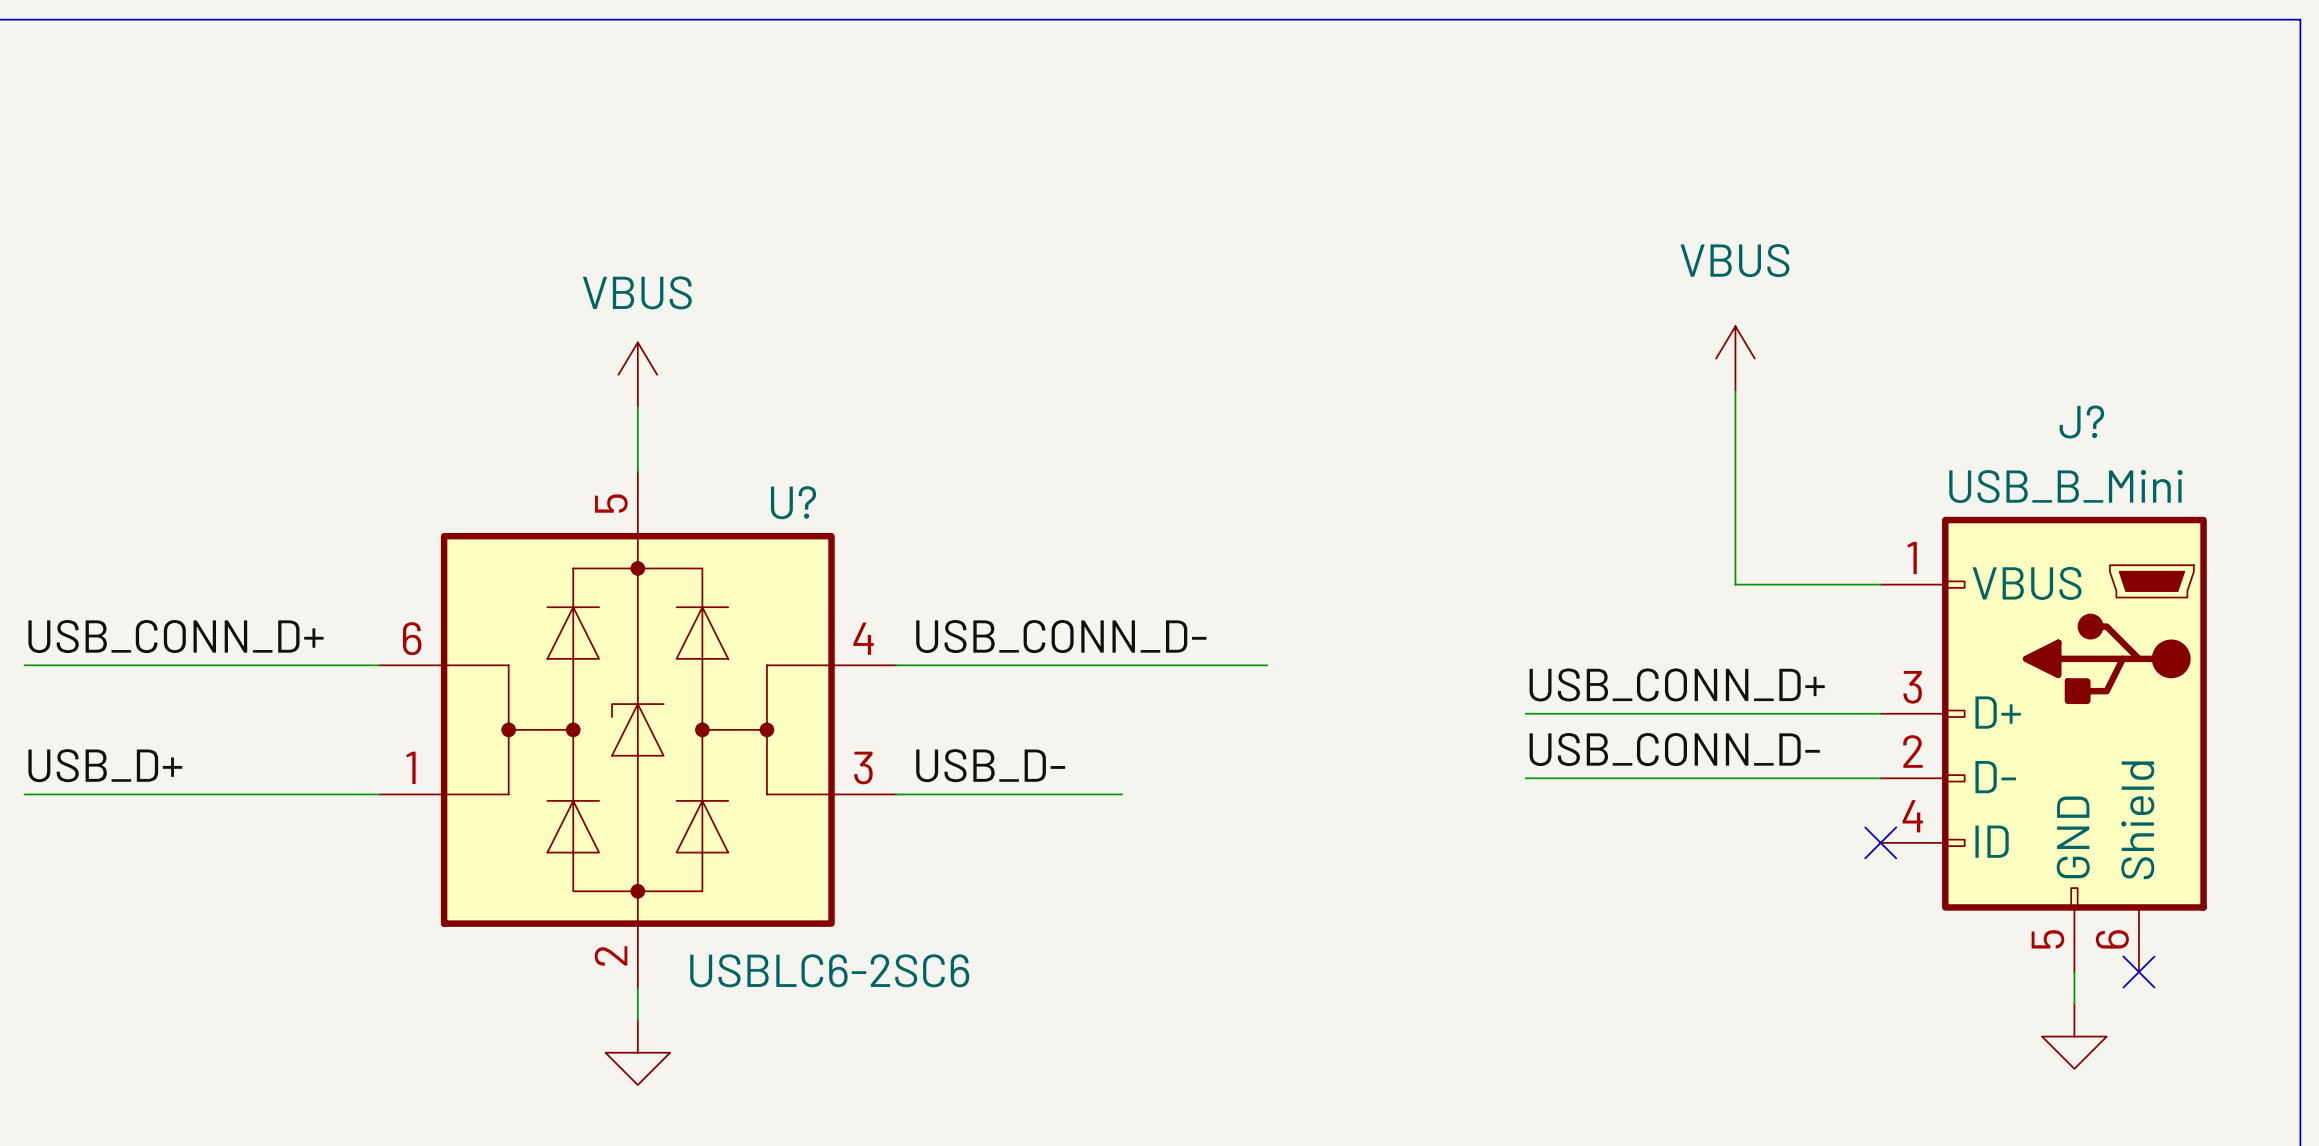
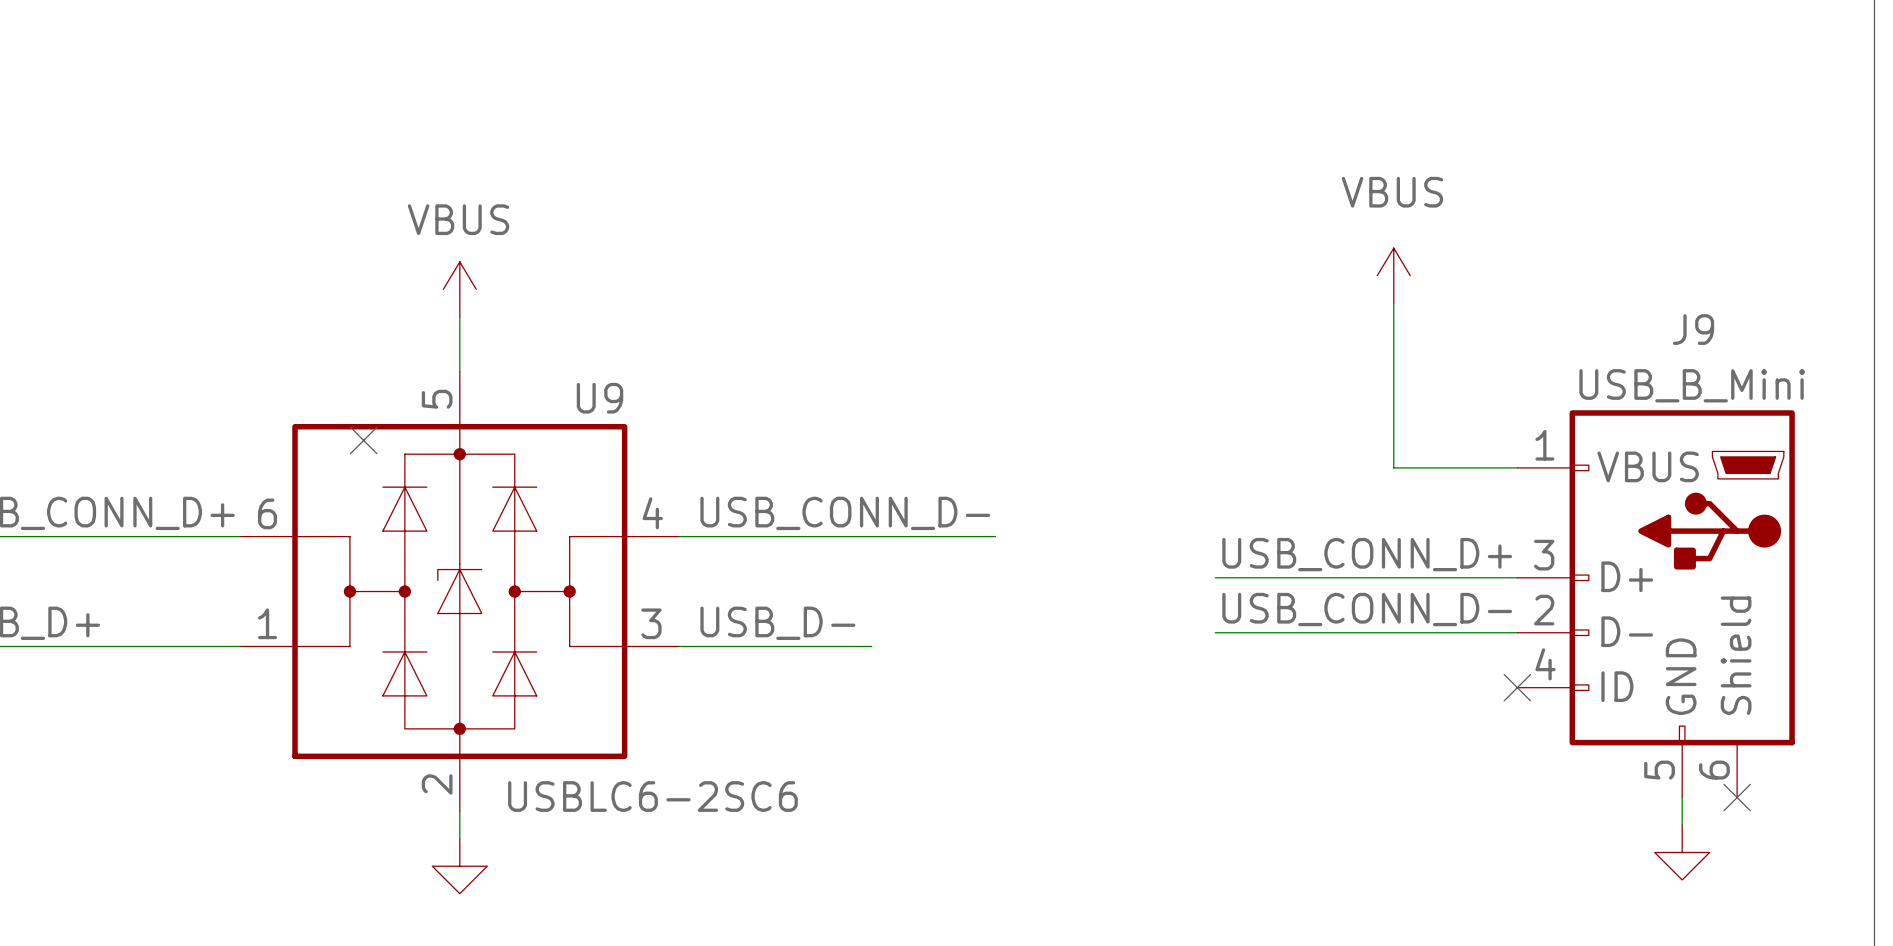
J? name: J? (2081, 421) -> J9 (1693, 329)
U? name: U? (793, 502) -> U9 (599, 398)
no-connect mark: none -> (363, 440)

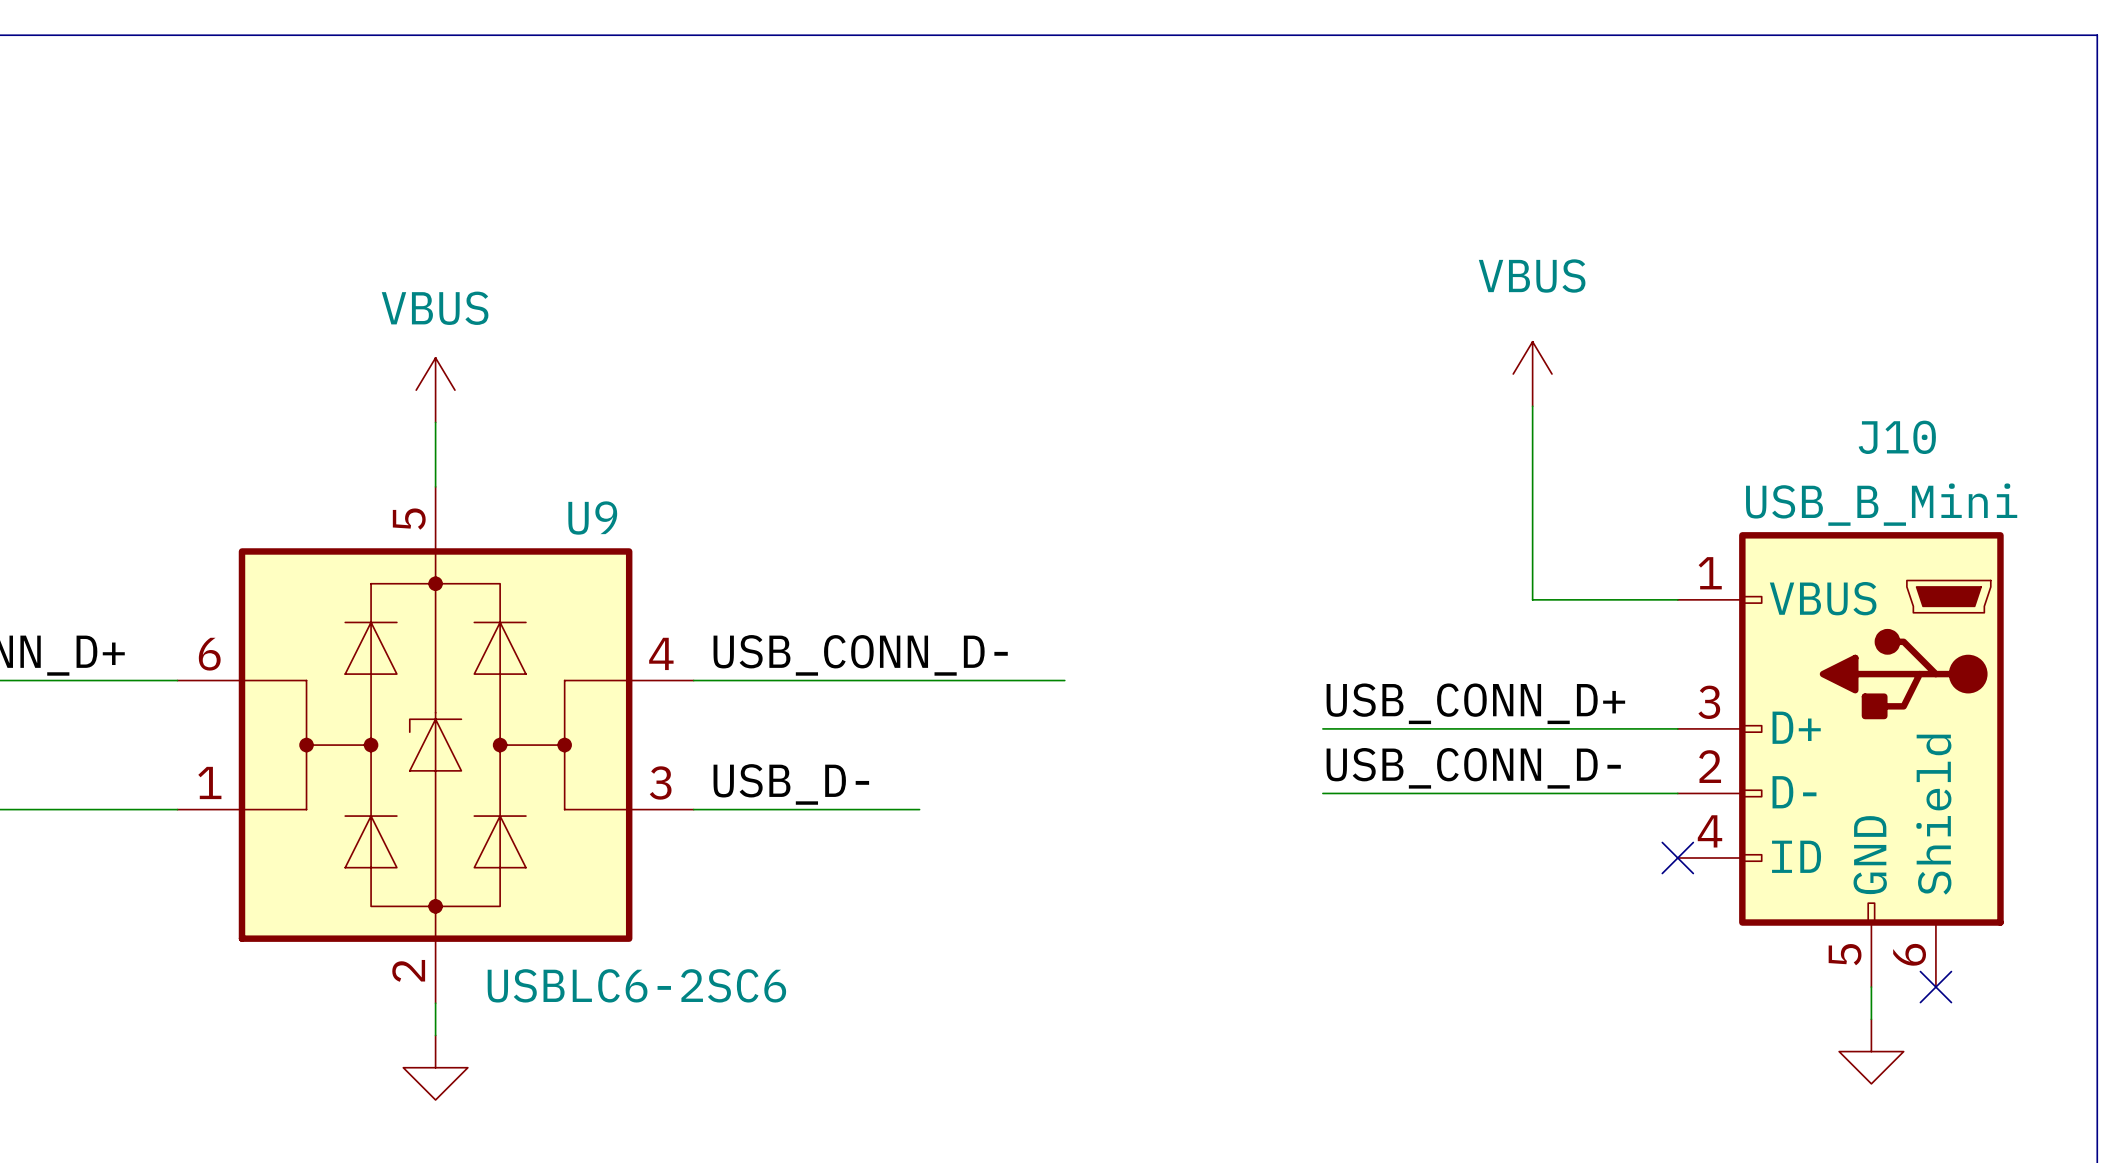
J9 name: J9 (1693, 329) -> J10 (1897, 437)
no-connect mark: (363, 440) -> none

